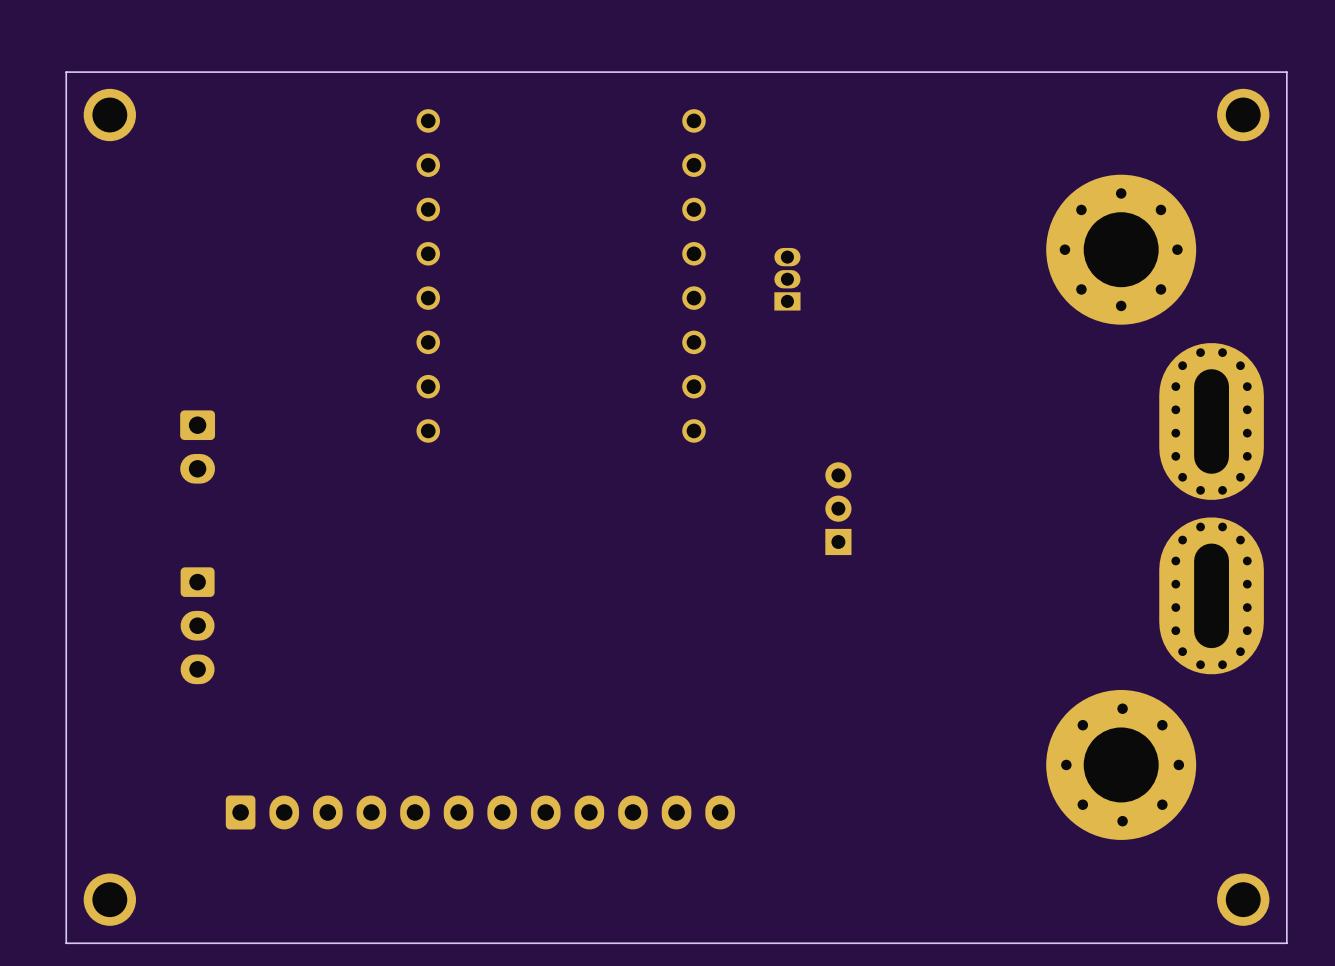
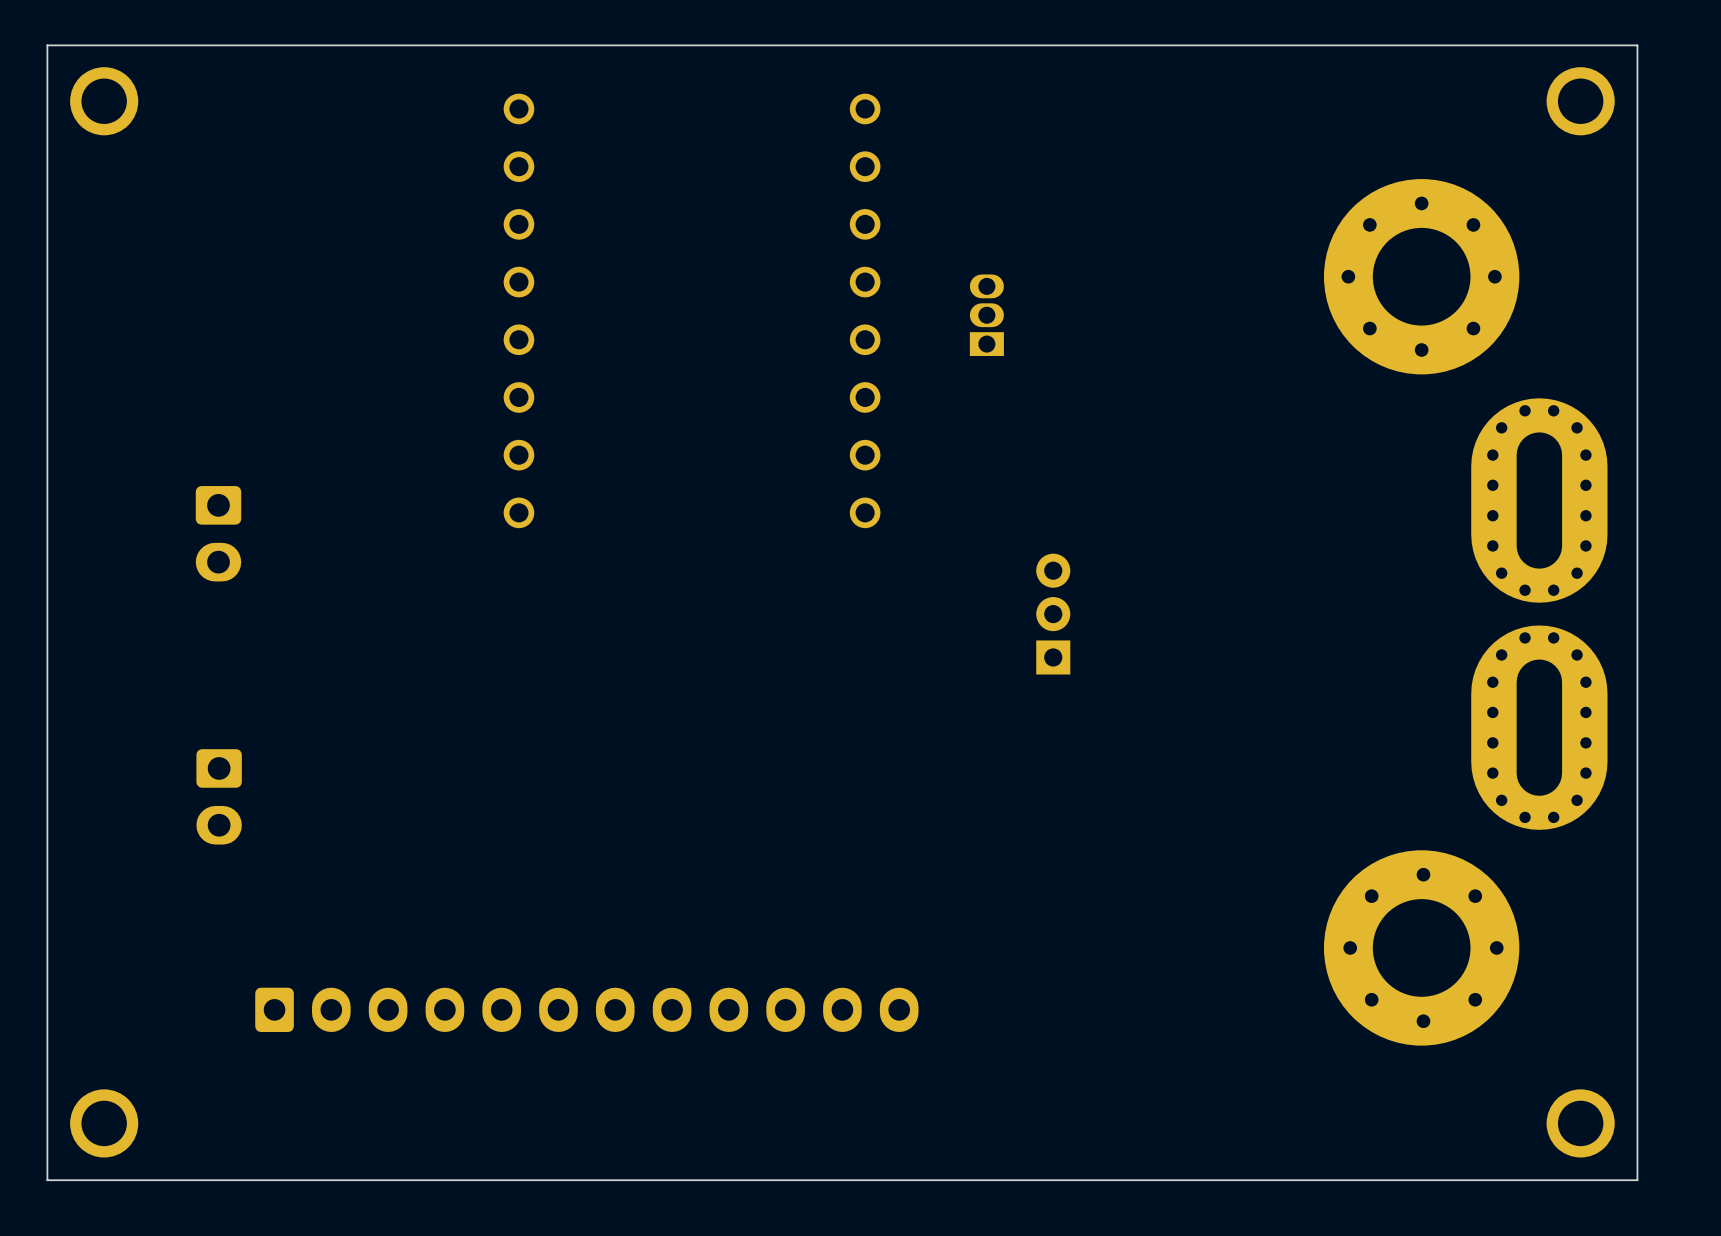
part: (197, 625) -> none
part: none -> (219, 796)

